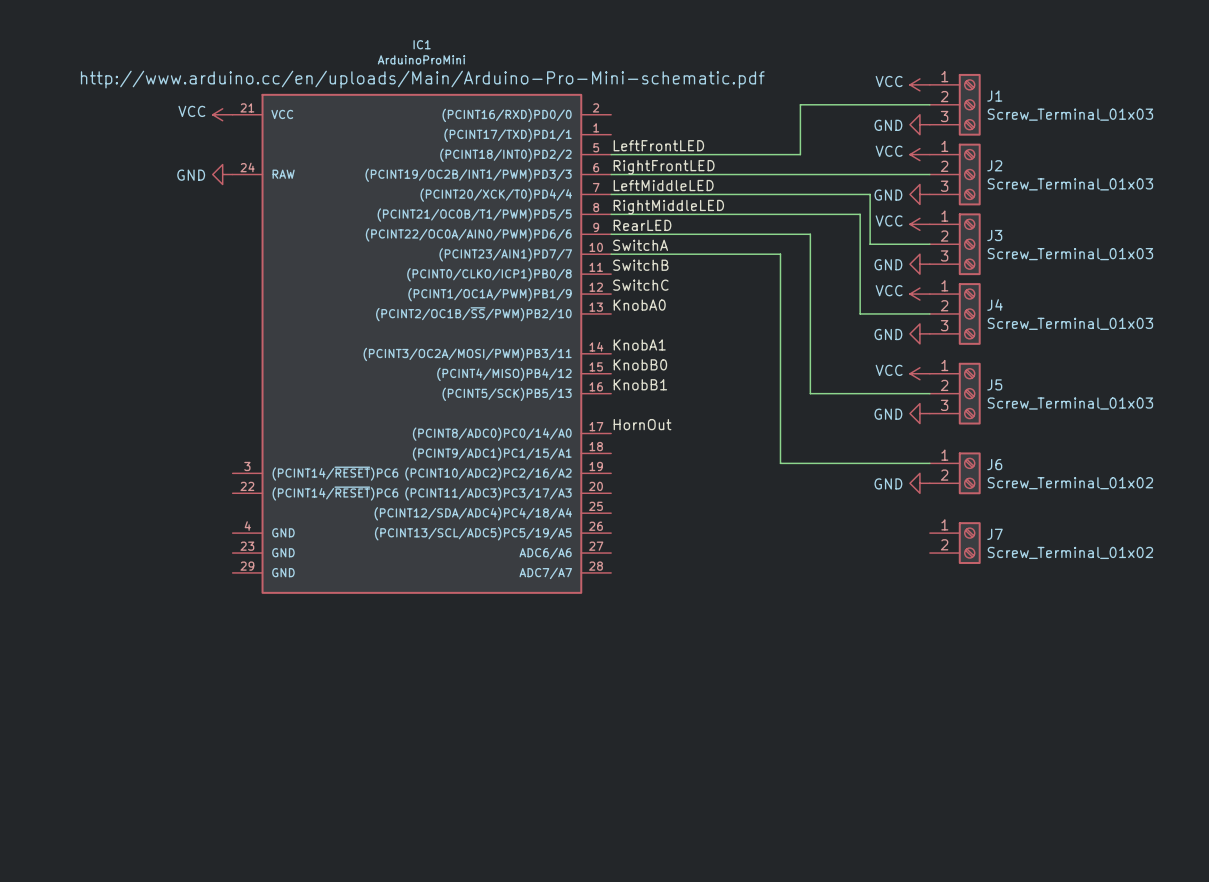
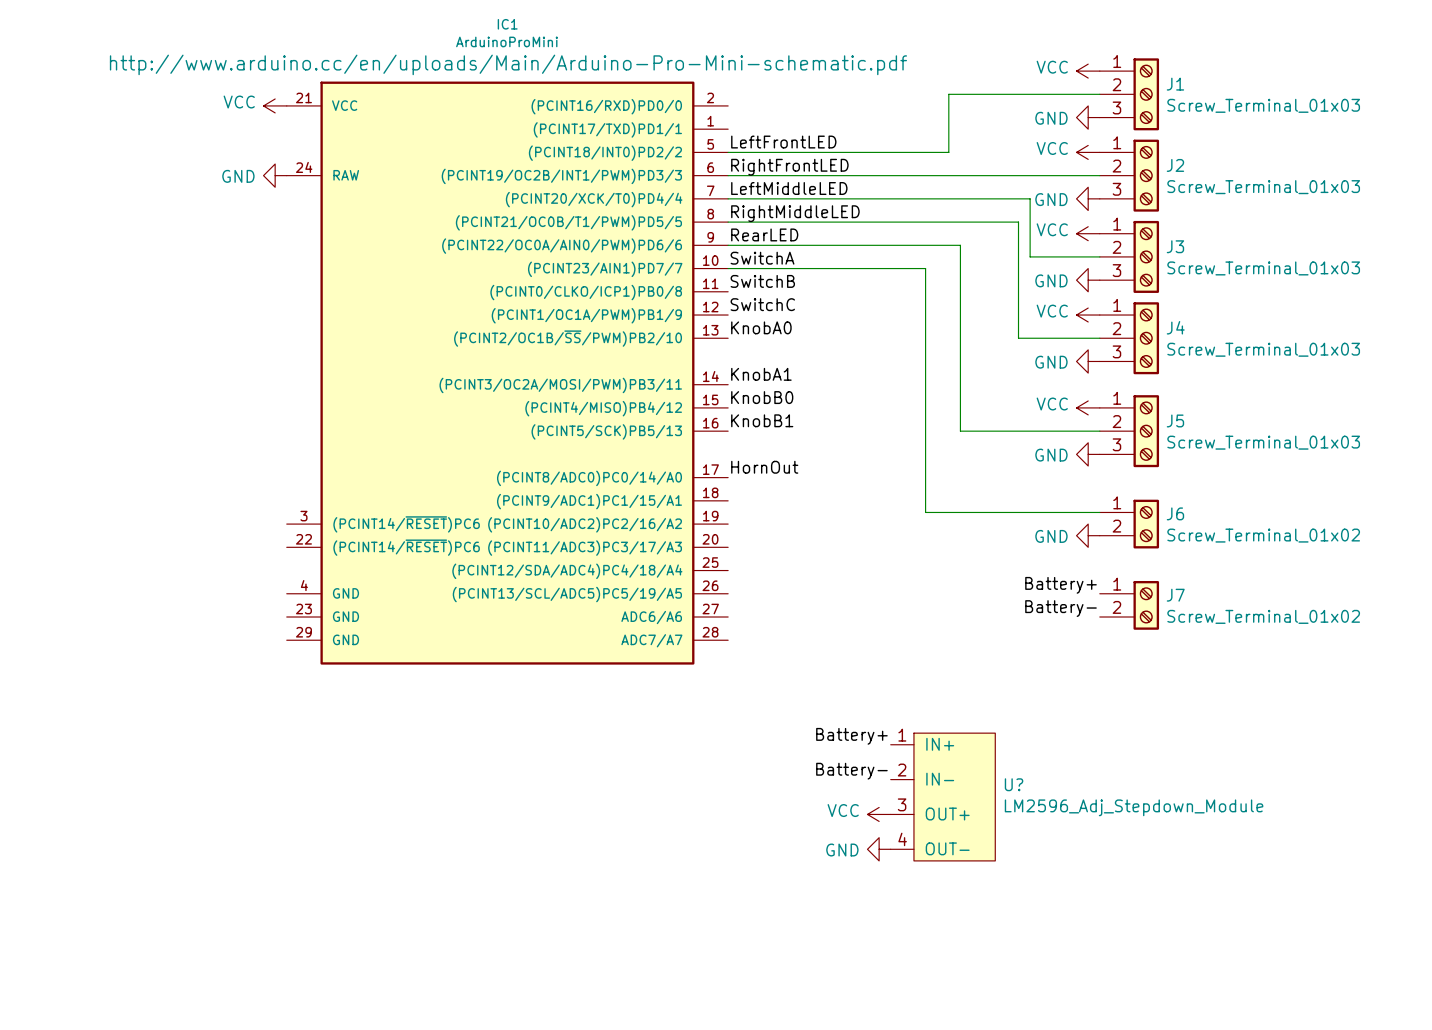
label: none -> Battery+ (1061, 585)
label: none -> Battery- (1061, 608)
label: none -> Battery+ (851, 736)
label: none -> Battery- (851, 771)
U?: none -> LM2596_Adj_Stepdown_Module (943, 797)
power symbol: none -> VCC (879, 814)
power symbol: none -> GND (879, 849)

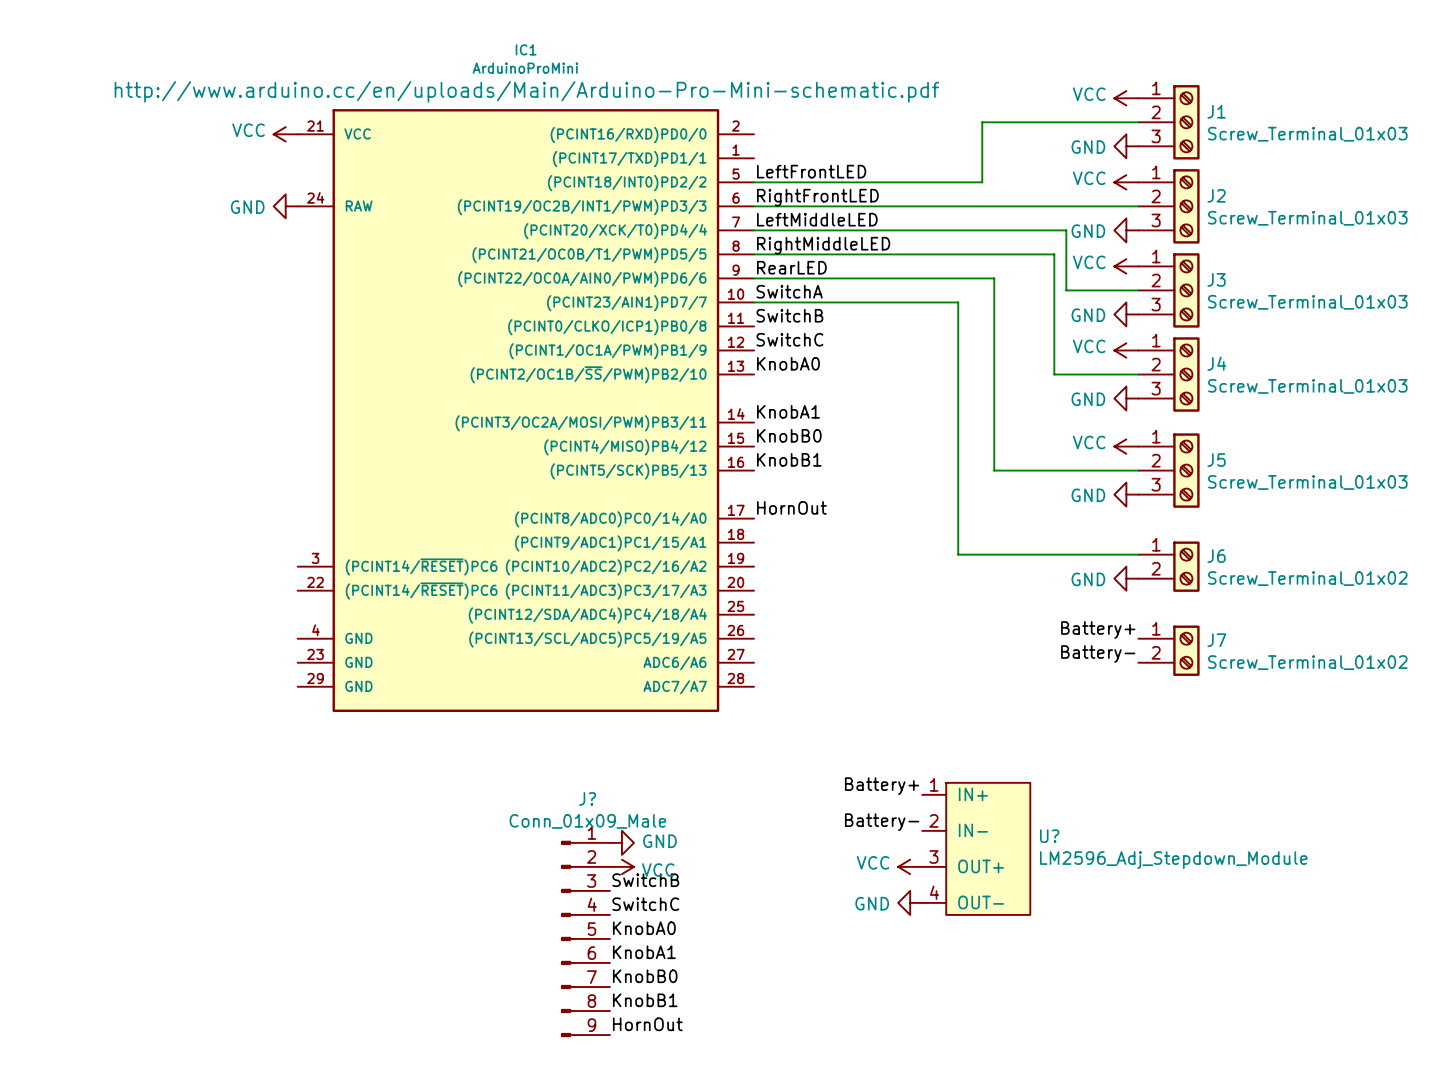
power symbol: none -> GND (621, 842)
power symbol: none -> VCC (621, 866)
label: none -> SwitchB (645, 880)
label: none -> SwitchC (645, 904)
label: none -> KnobA0 (644, 928)
J?: none -> Conn_01x09_Male (585, 938)
label: none -> KnobA1 (644, 952)
label: none -> KnobB0 (645, 976)
label: none -> KnobB1 (645, 1000)
label: none -> HornOut (647, 1024)

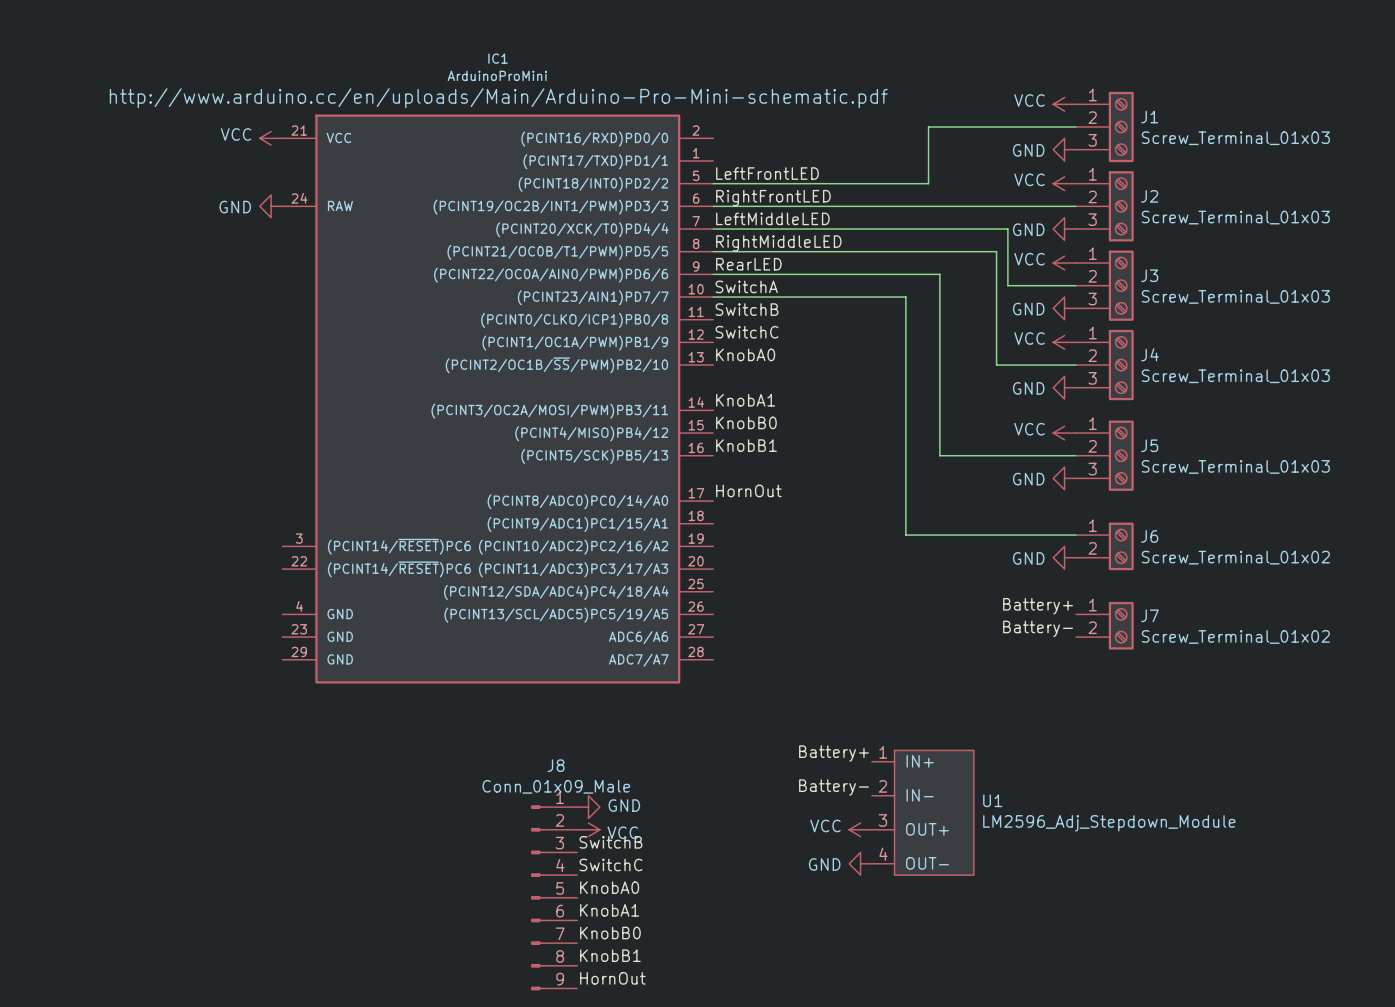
J? name: J? (587, 798) -> J8 (556, 765)
U? name: U? (1049, 836) -> U1 (992, 800)

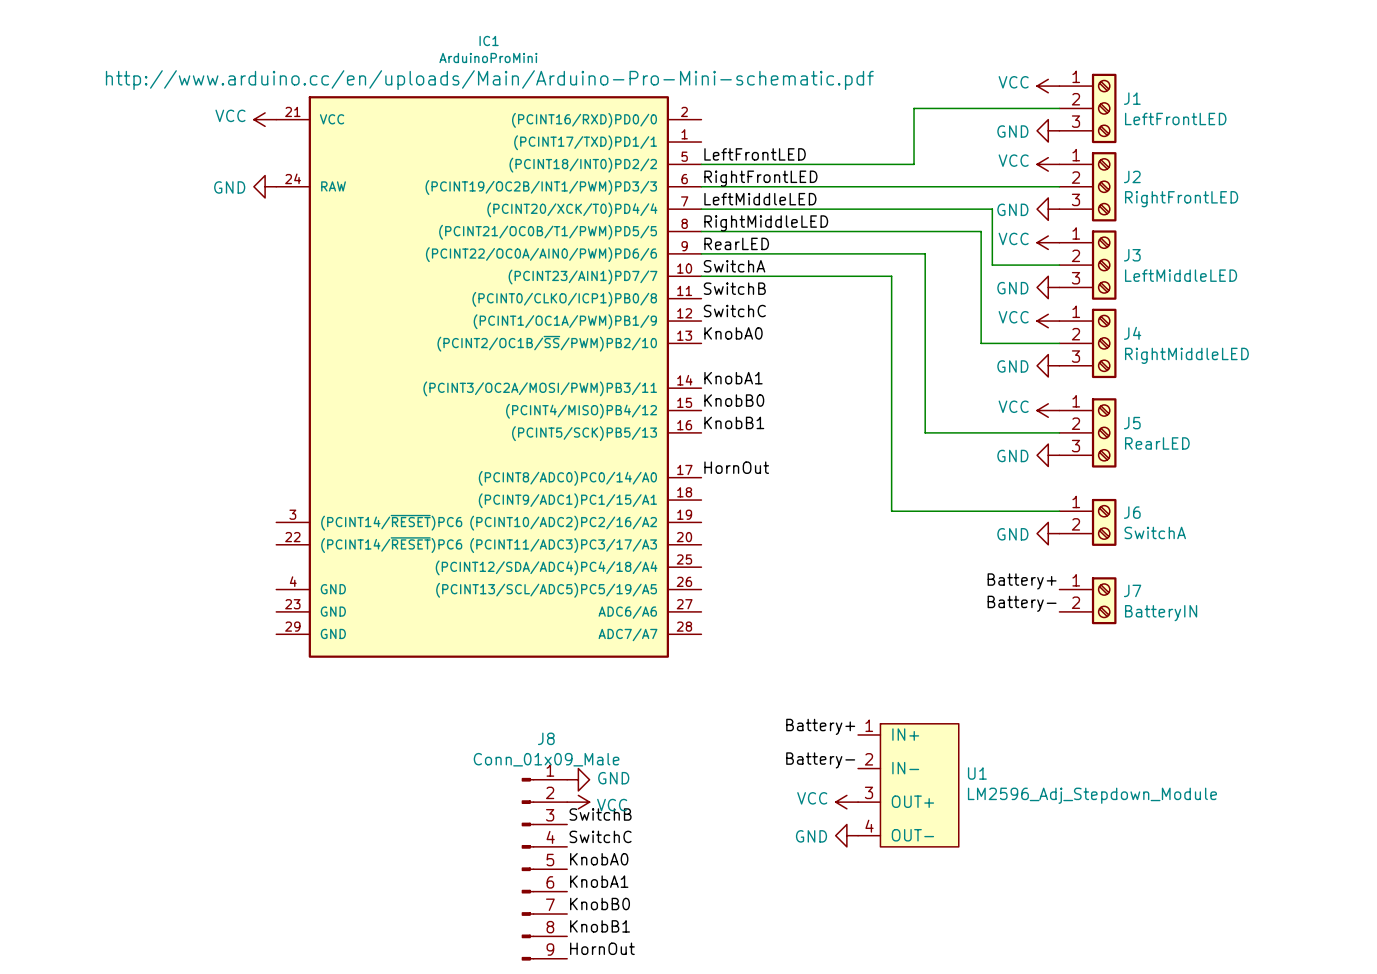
J1 value: Screw_Terminal_01x03 (1235, 138) -> LeftFrontLED (1175, 118)
J2 value: Screw_Terminal_01x03 (1235, 217) -> RightFrontLED (1181, 199)
J3 value: Screw_Terminal_01x03 (1235, 296) -> LeftMiddleLED (1181, 275)
J4 value: Screw_Terminal_01x03 (1235, 376) -> RightMiddleLED (1186, 355)
J5 value: Screw_Terminal_01x03 (1235, 466) -> RearLED (1157, 443)
J6 value: Screw_Terminal_01x02 (1235, 557) -> SwitchA (1155, 532)
J7 value: Screw_Terminal_01x02 (1235, 636) -> BatteryIN (1161, 613)

